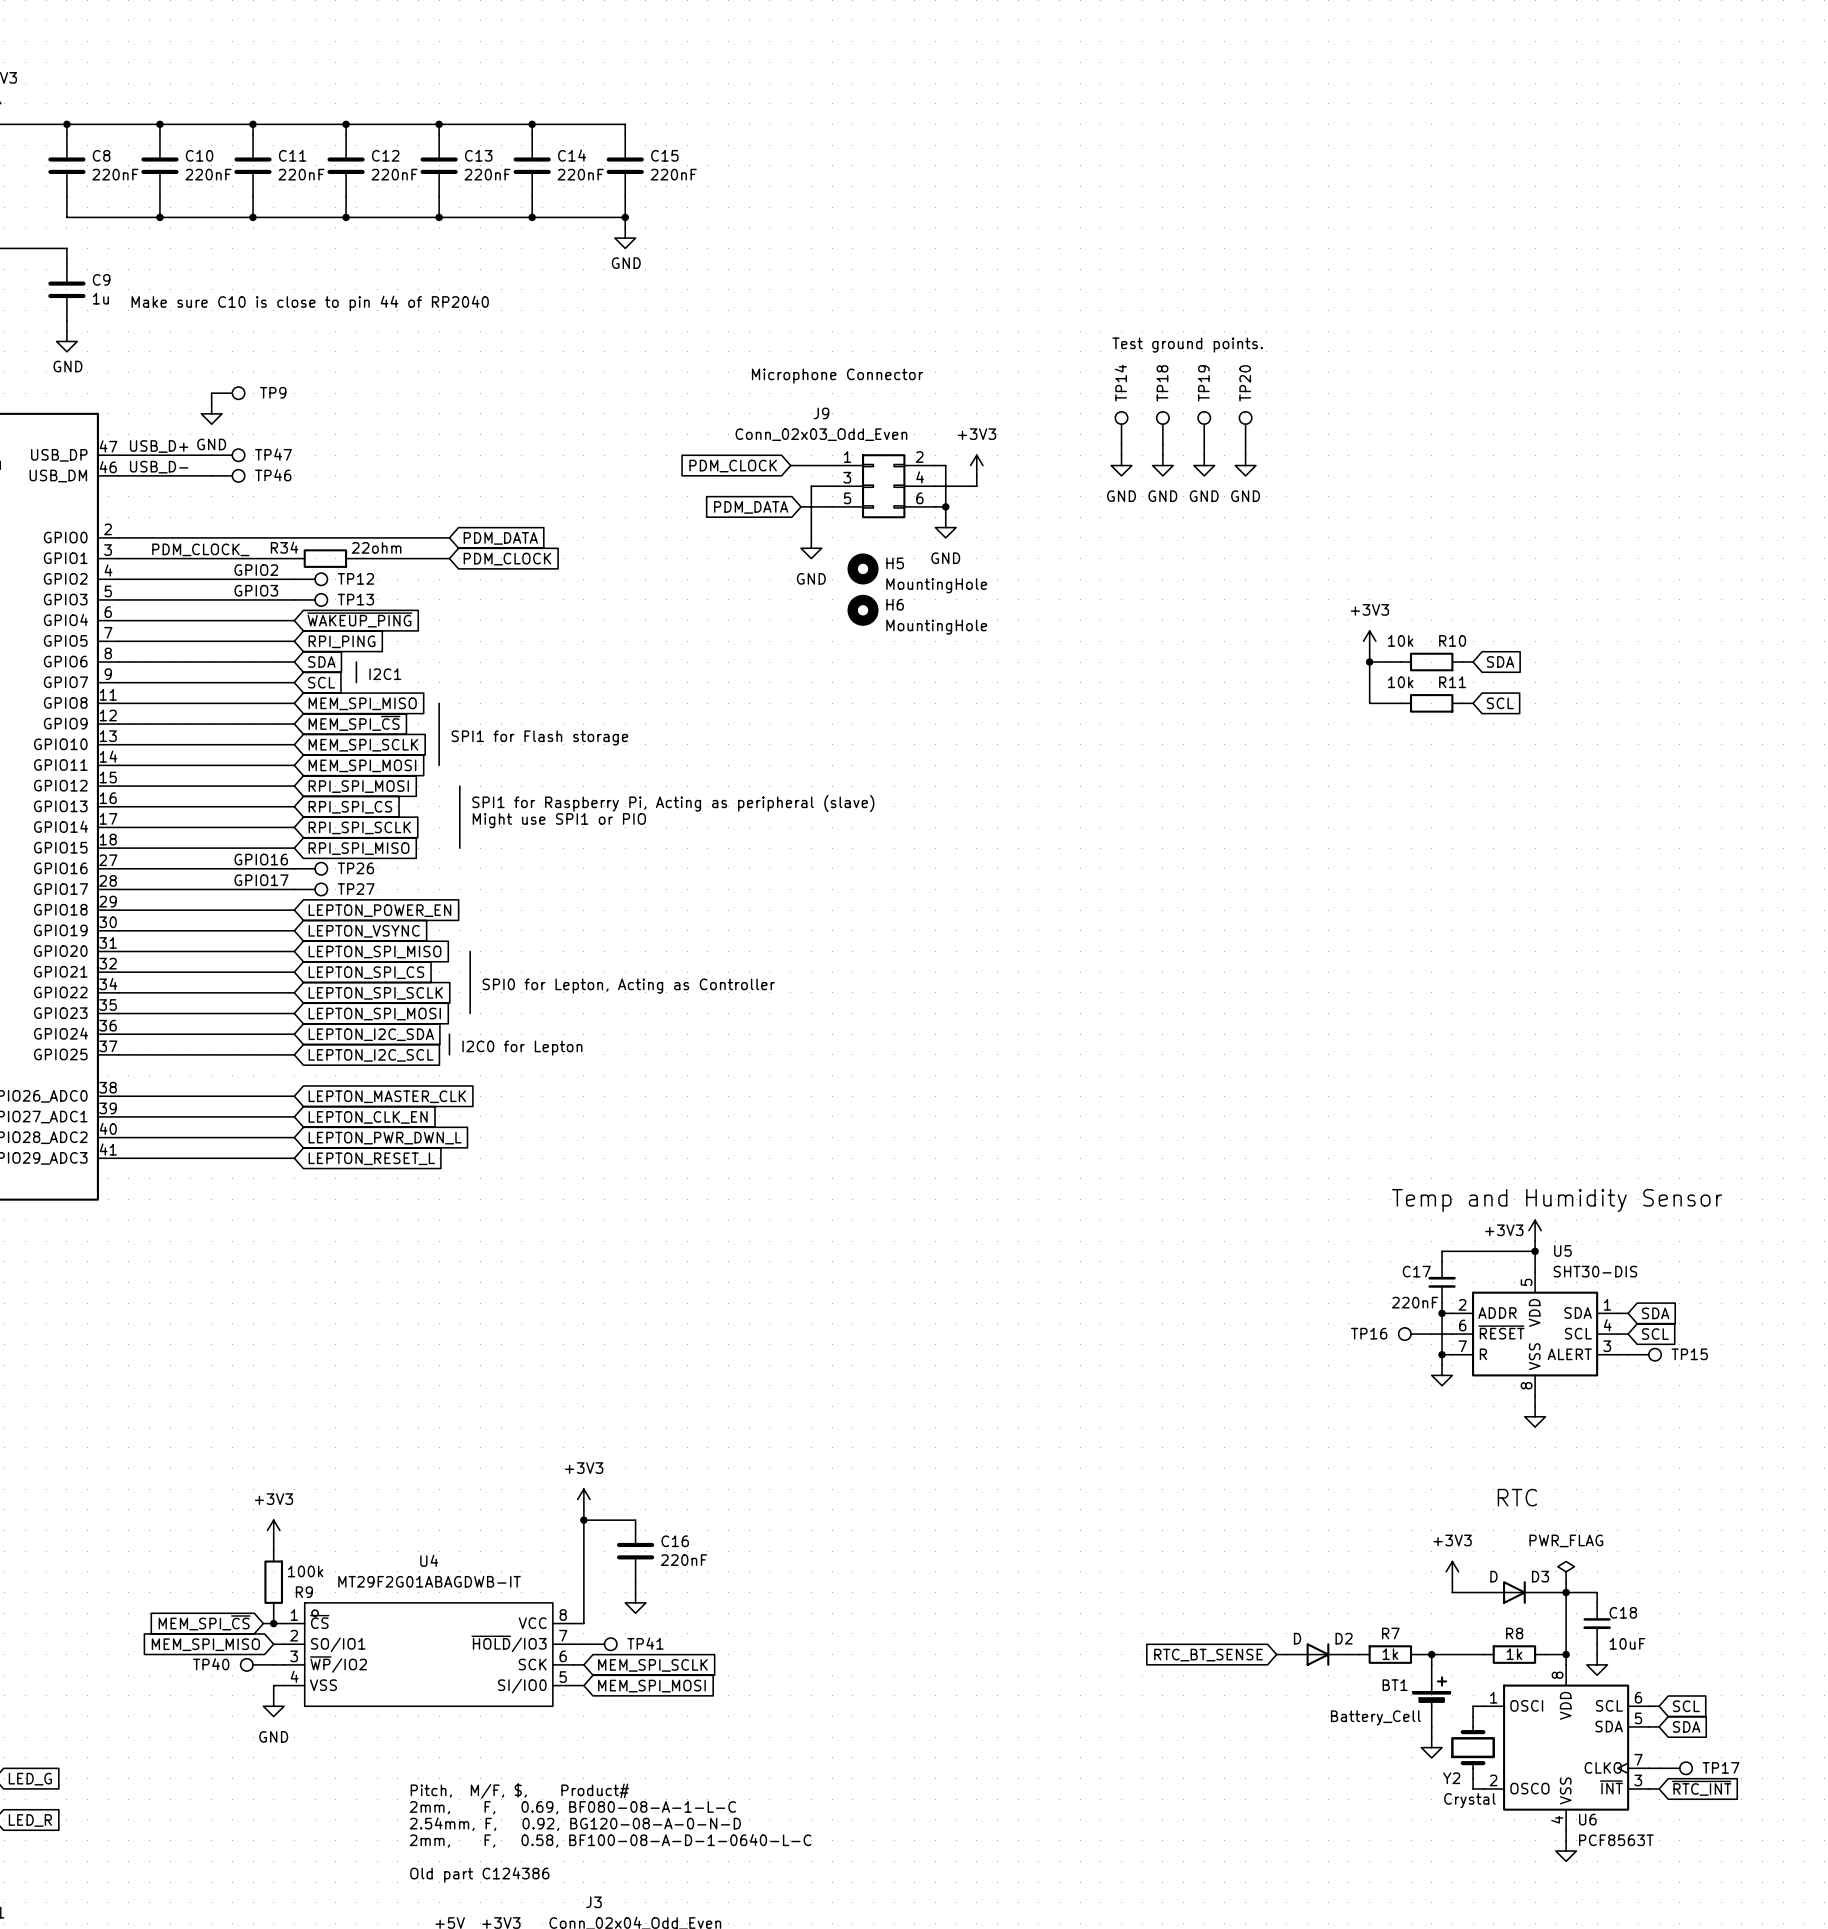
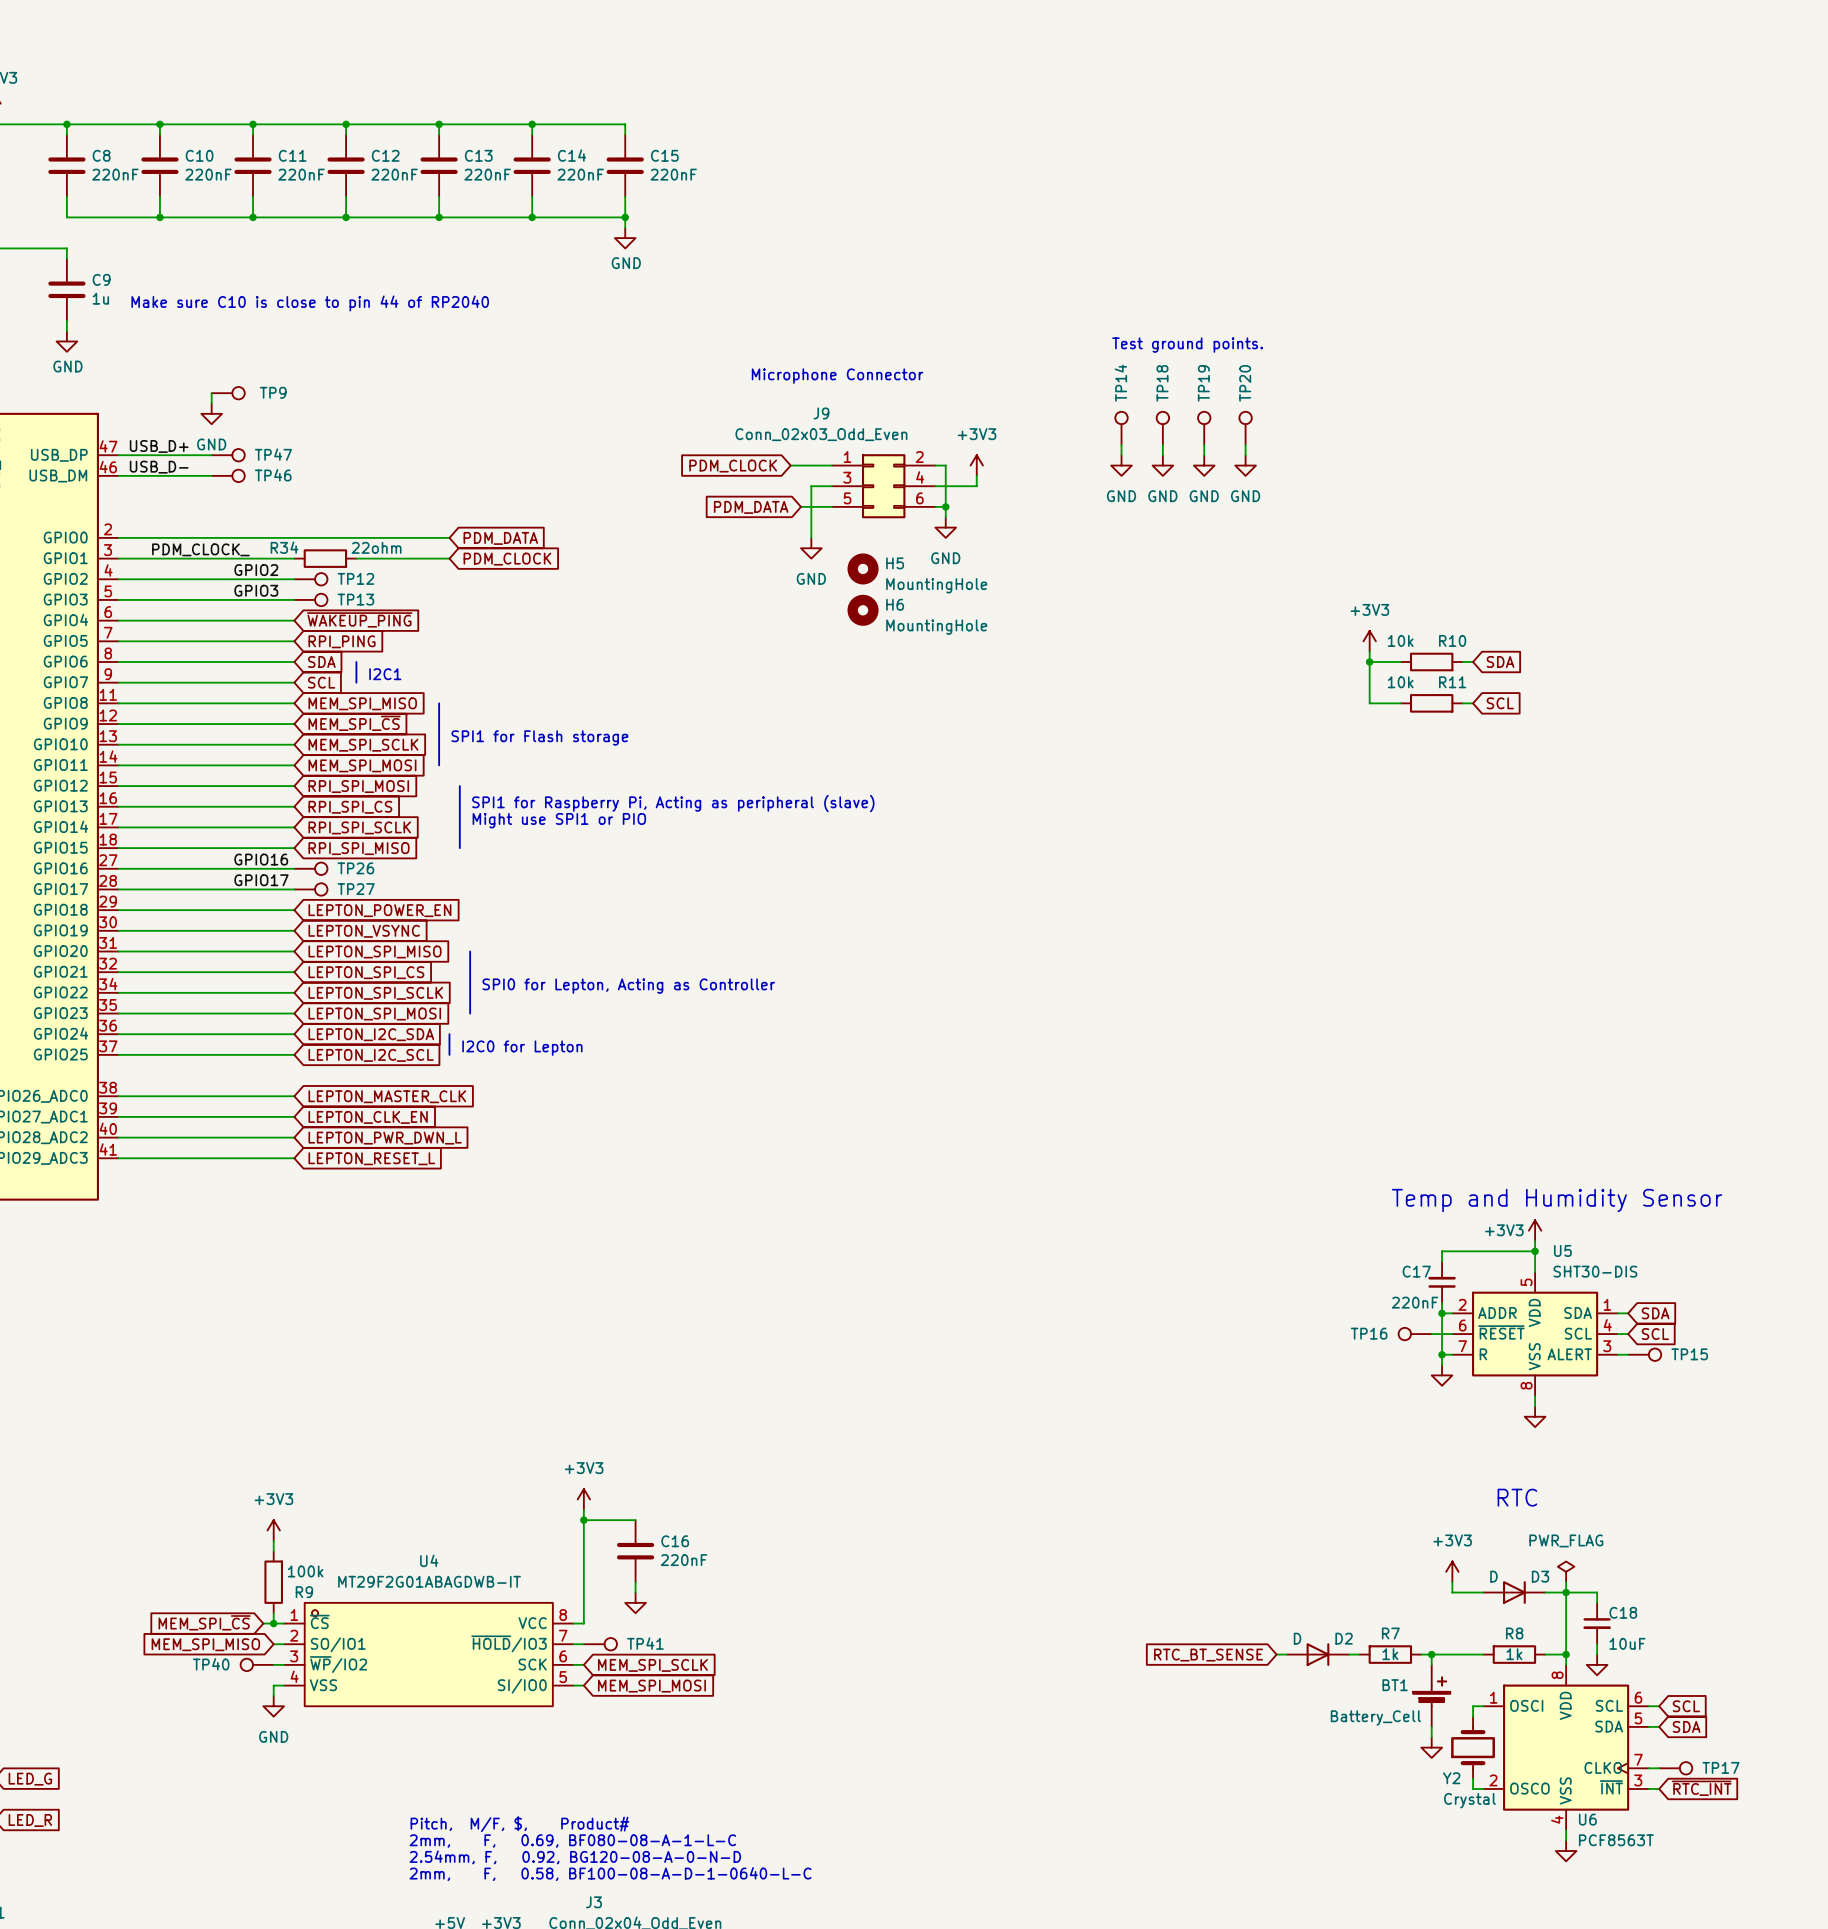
text: Pitch, M/F, $, Product# (519, 1790) -> none
text: 2mm, F, 0.69, BF080-08-A-1-L-C (572, 1807) -> none
text: 2.54mm, F, 0.92, BG120-08-A-0-N-D (575, 1824) -> Pitch, M/F, $, Product# (519, 1824)
text: 2mm, F, 0.58, BF100-08-A-D-1-0640-L-C (610, 1840) -> 2mm, F, 0.69, BF080-08-A-1-L-C (572, 1841)
text: none -> 2.54mm, F, 0.92, BG120-08-A-0-N-D (575, 1857)
text: Old part C124386 (479, 1875) -> 2mm, F, 0.58, BF100-08-A-D-1-0640-L-C (610, 1874)

